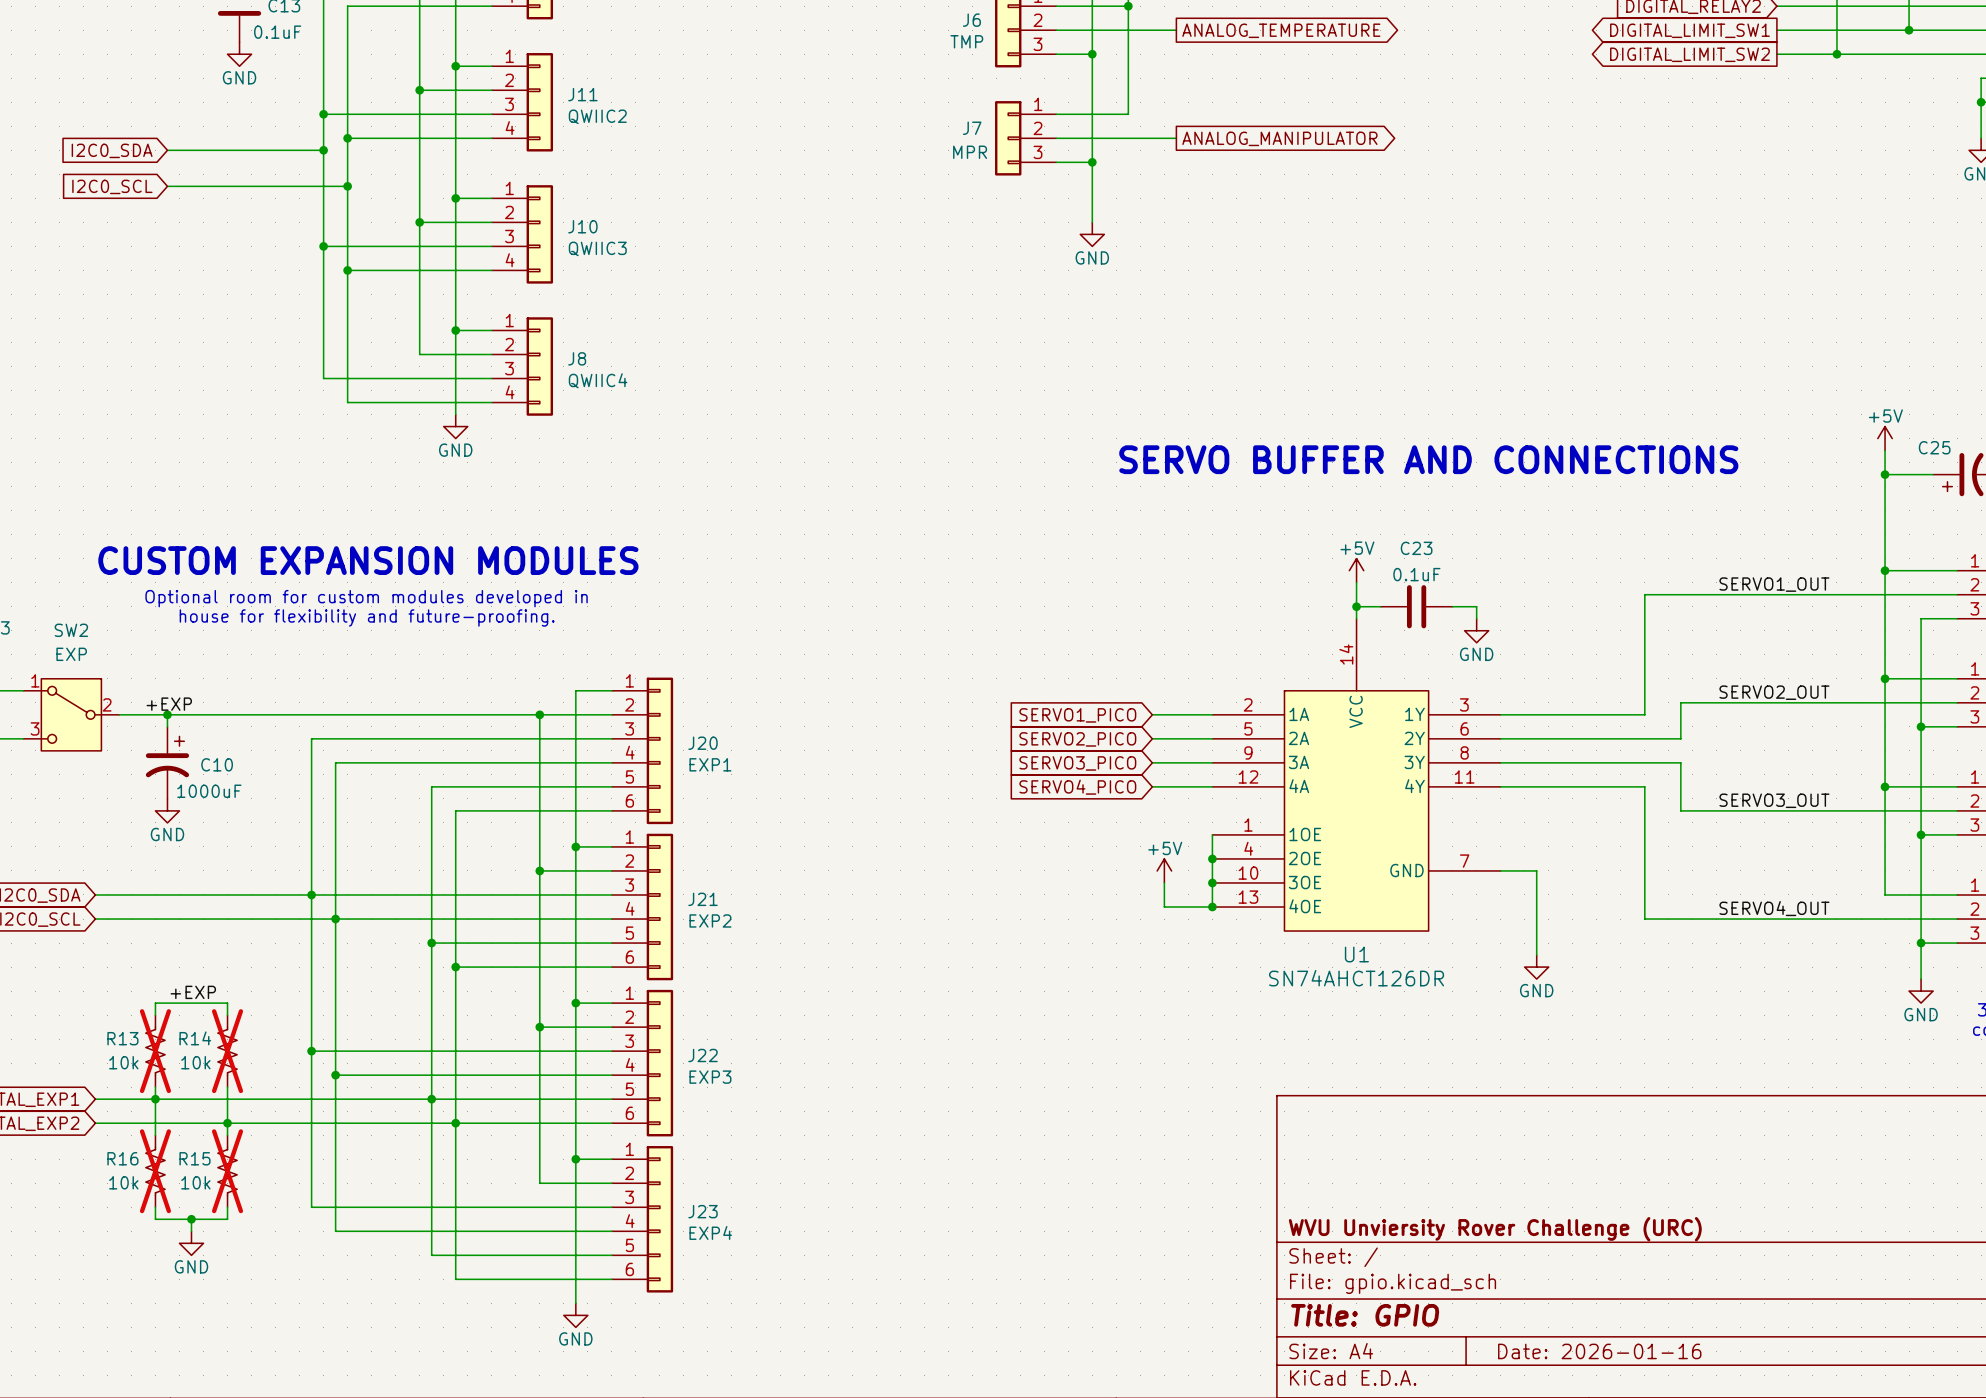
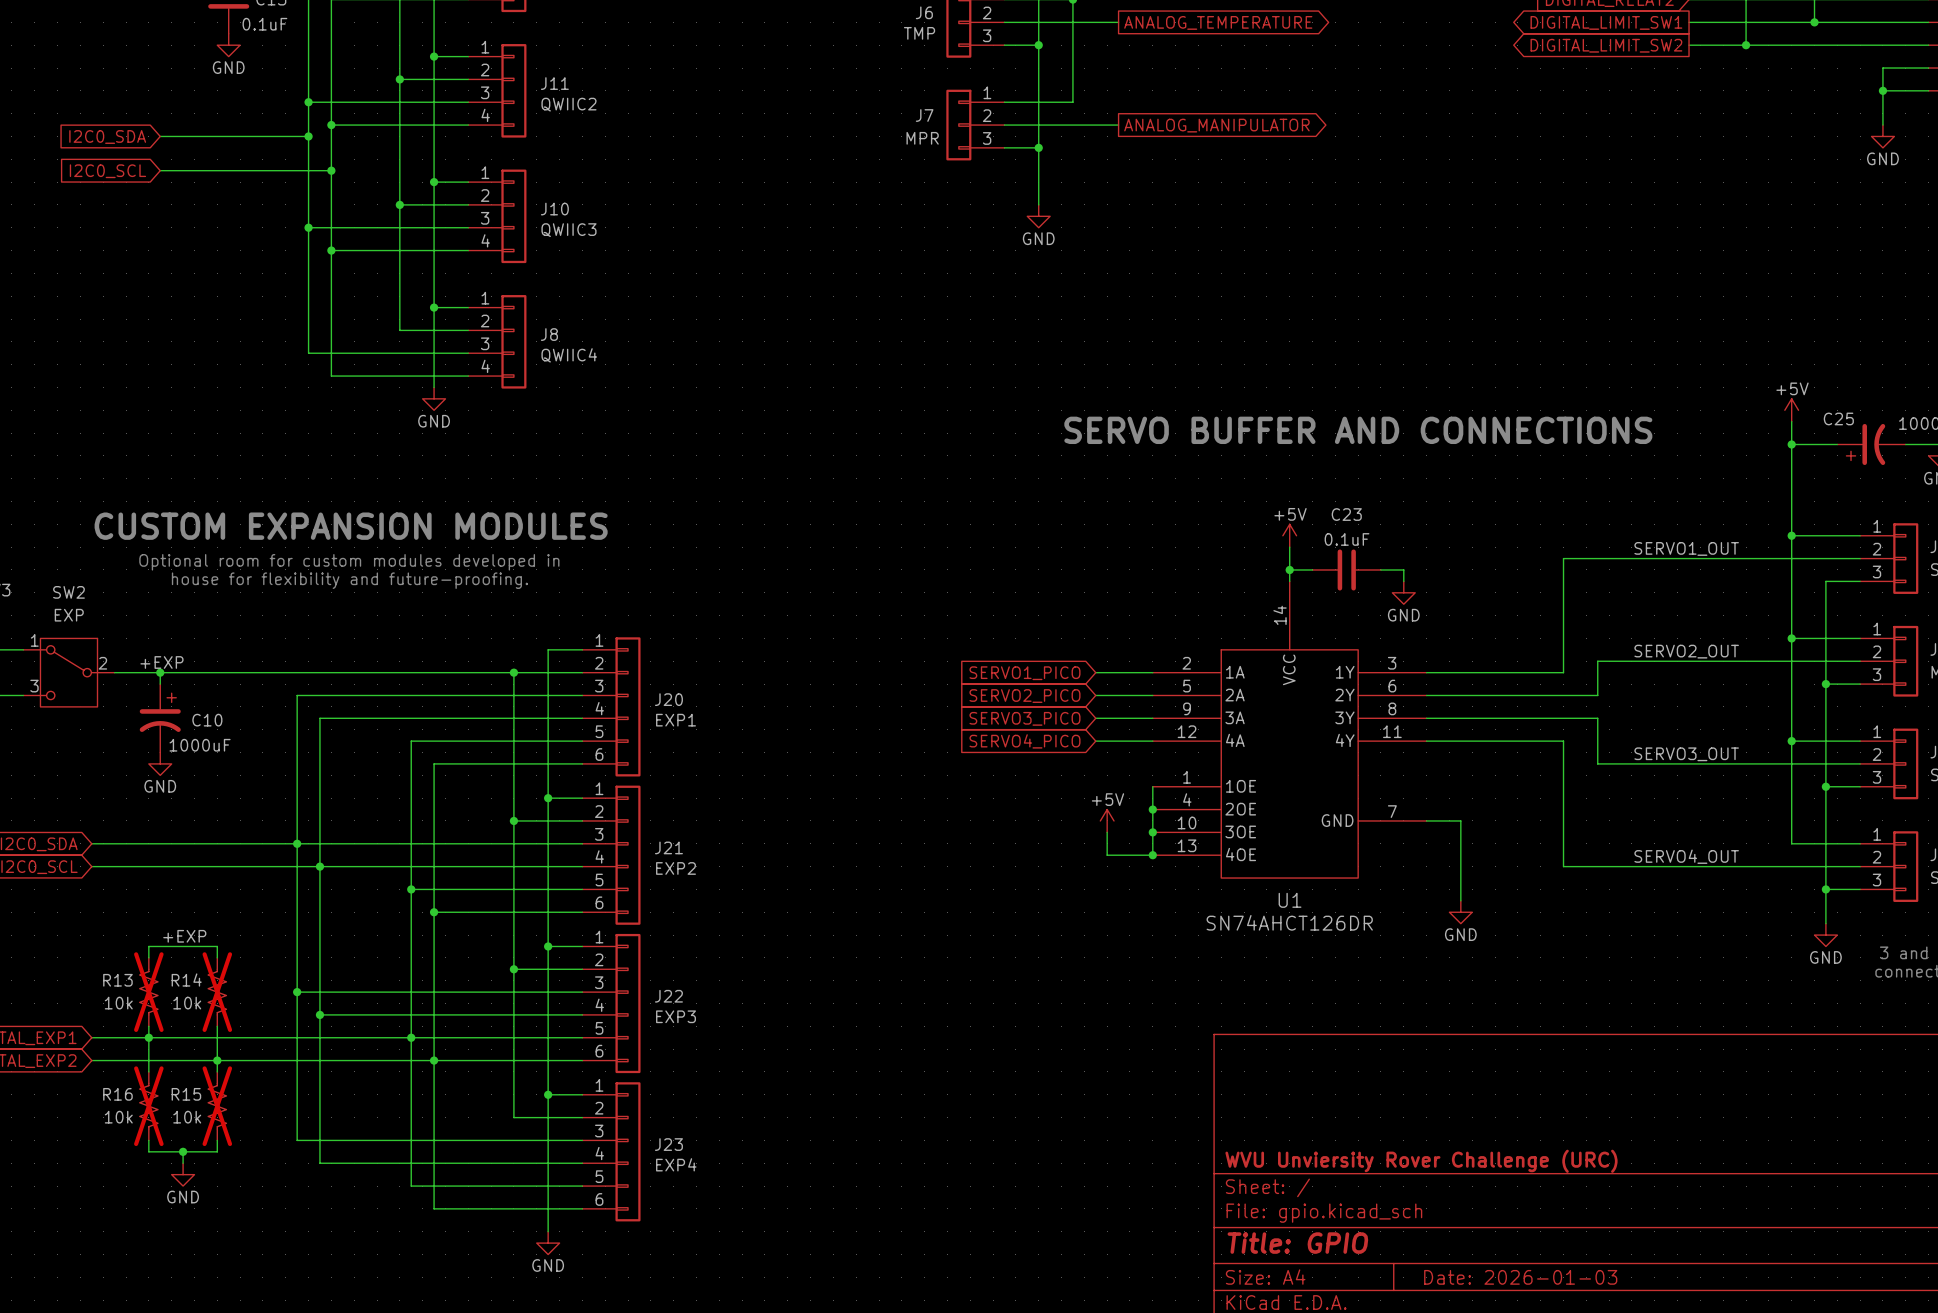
title block: Date: 2026-01-16 (1599, 1351) -> Date: 2026-01-03 (1520, 1277)

